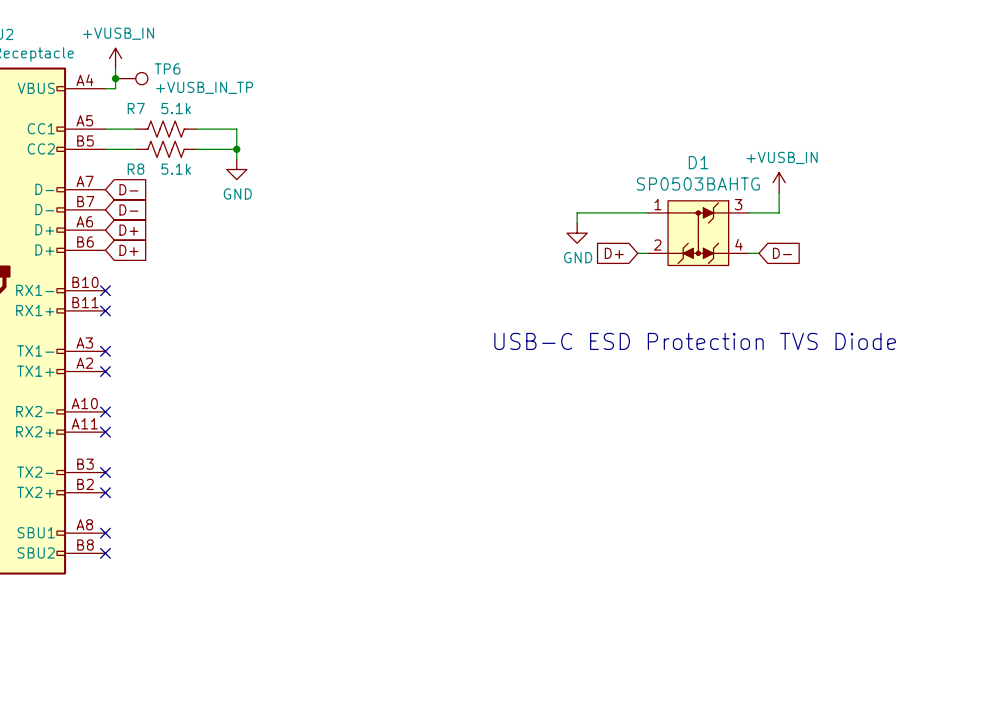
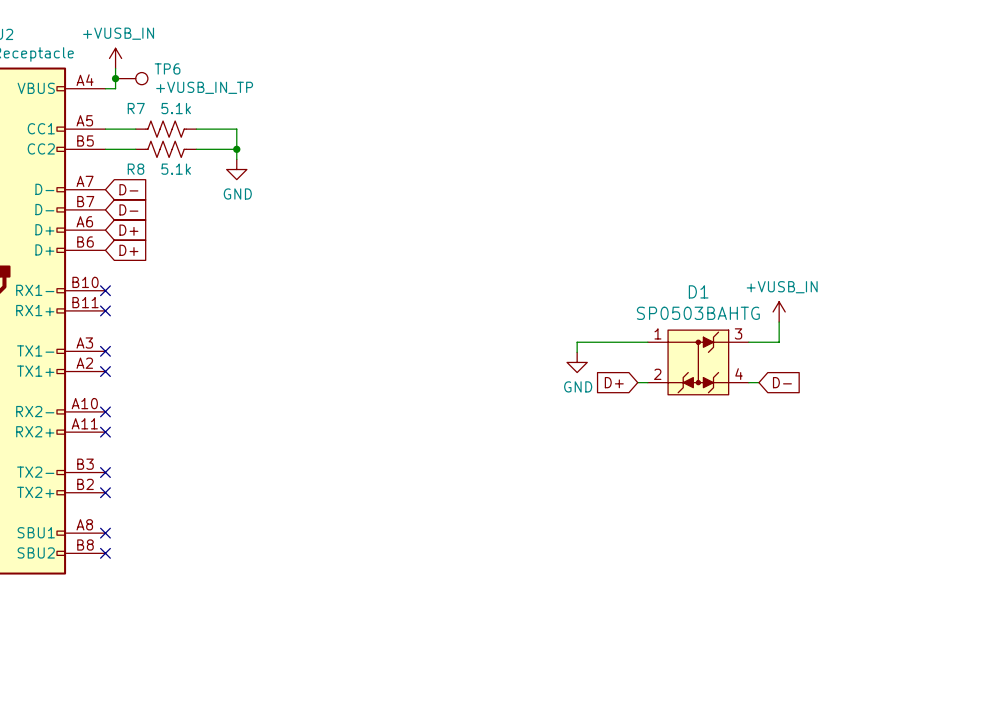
power symbol position: +VUSB_IN (779, 182) -> +VUSB_IN (779, 311)
wire: (779, 192) (779, 212) (748, 212) -> (779, 322) (779, 342) (748, 342)
wire: (647, 212) (577, 212) (577, 223) -> (647, 342) (577, 342) (577, 352)
power symbol position: GND (577, 233) -> GND (577, 362)
D1 position: (698, 233) -> (698, 362)
global label position: D+ (614, 253) -> D+ (614, 382)
wire: (637, 253) (647, 253) -> (637, 382) (647, 382)
wire: (748, 253) (758, 253) -> (748, 382) (758, 382)
global label position: D- (782, 253) -> D- (782, 382)
text: USB-C ESD Protection TVS Diode (695, 341) -> none

